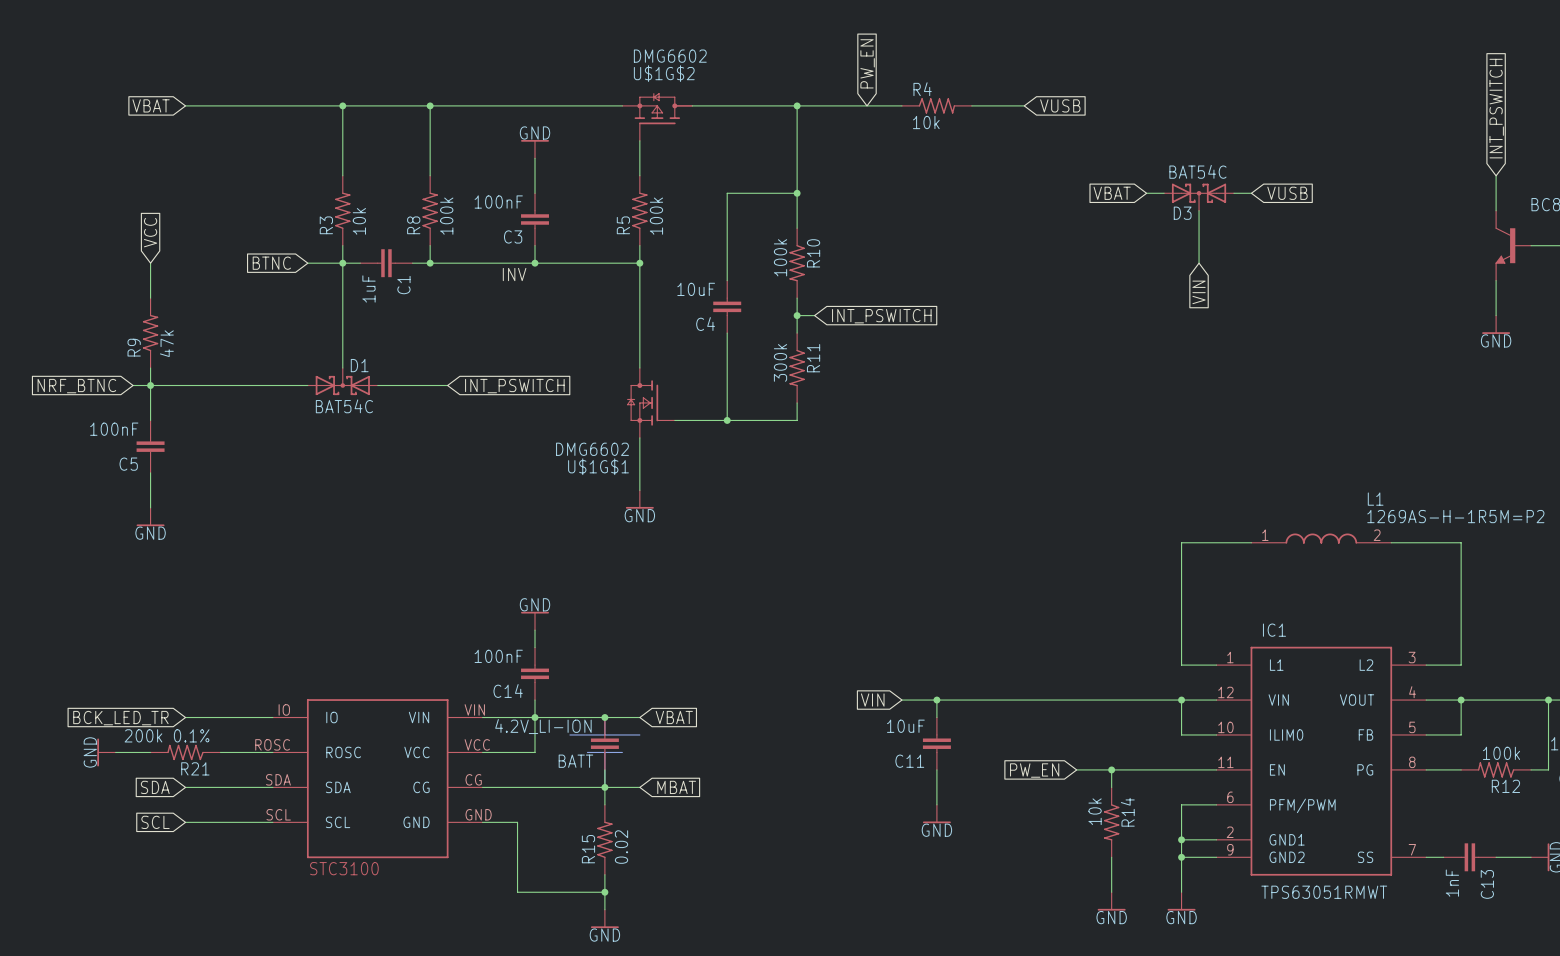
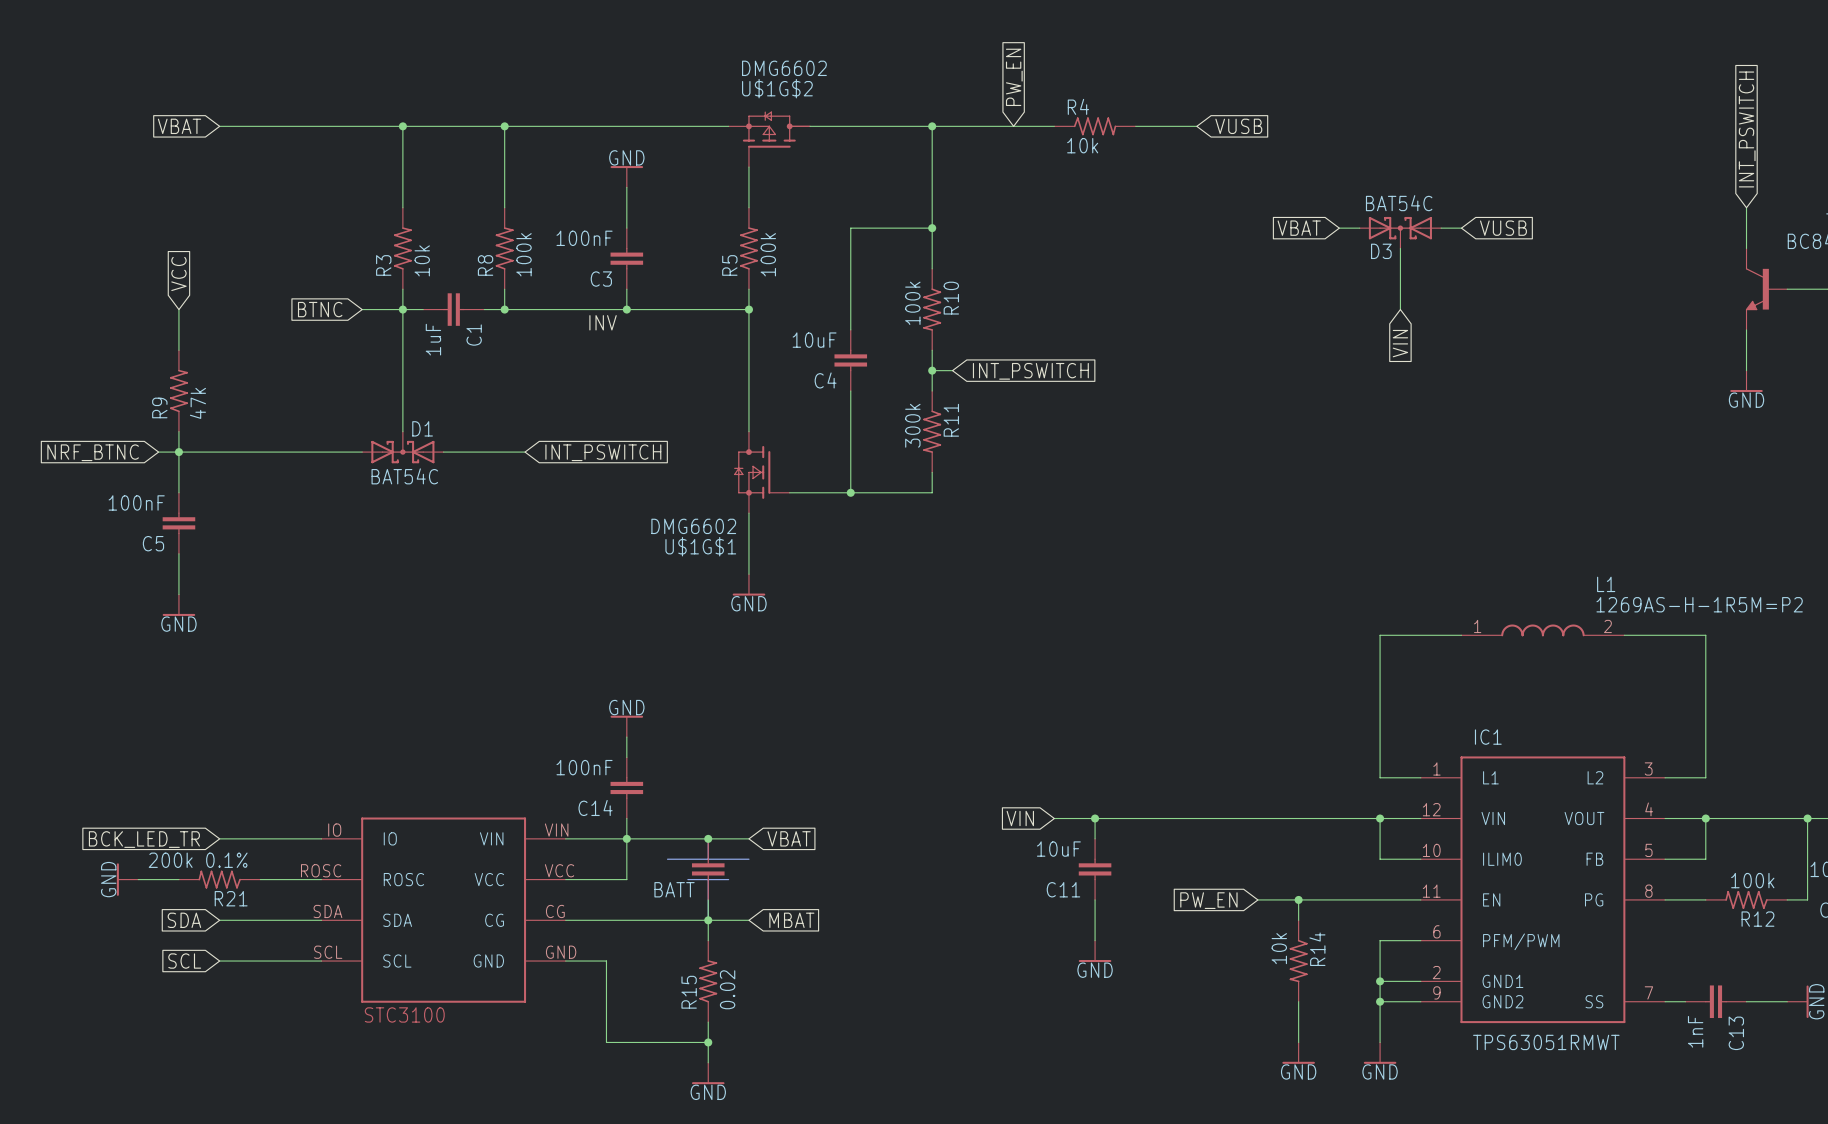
BATT value: 4.2V_LI-ION (543, 726) -> none

